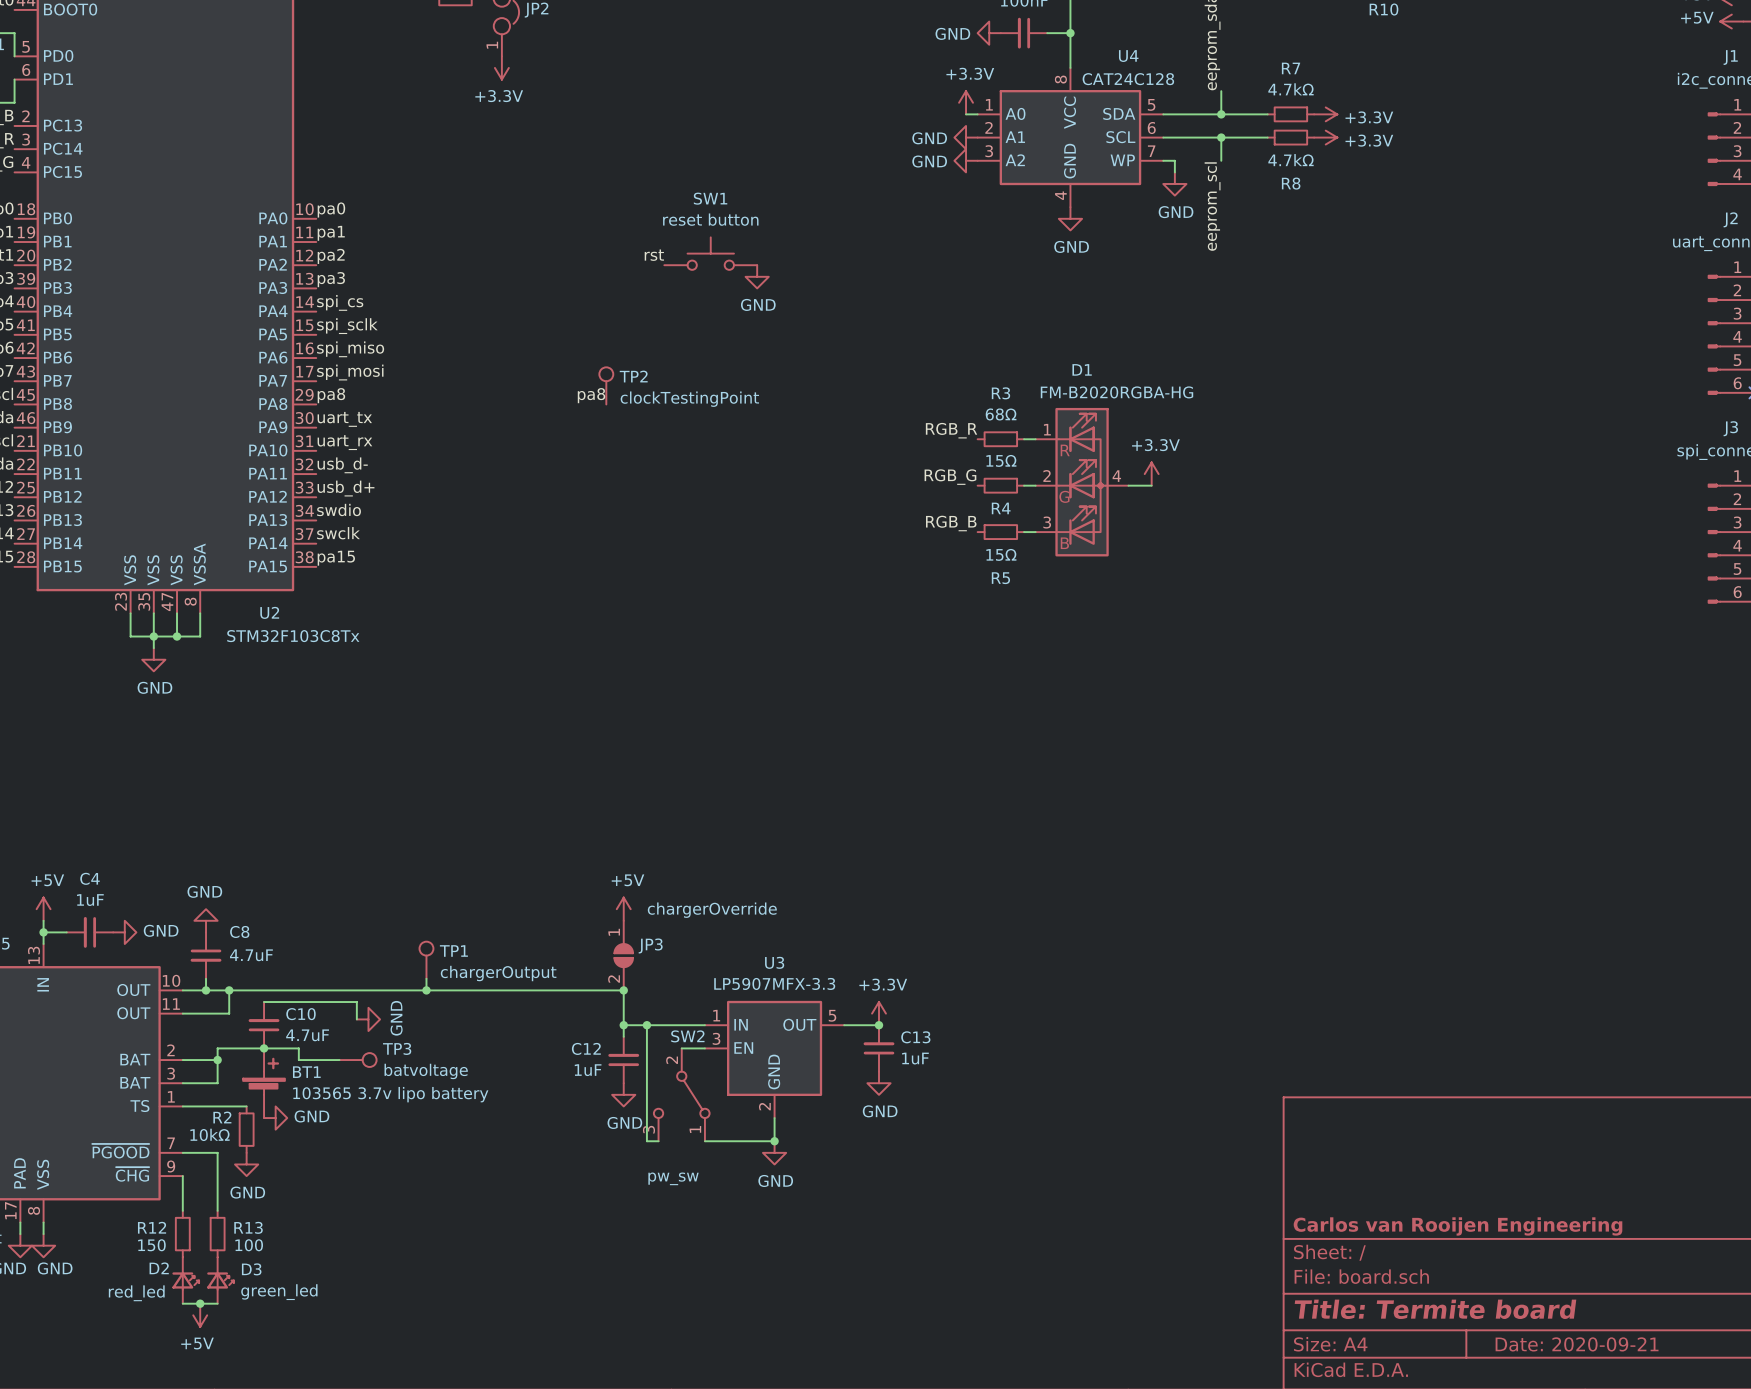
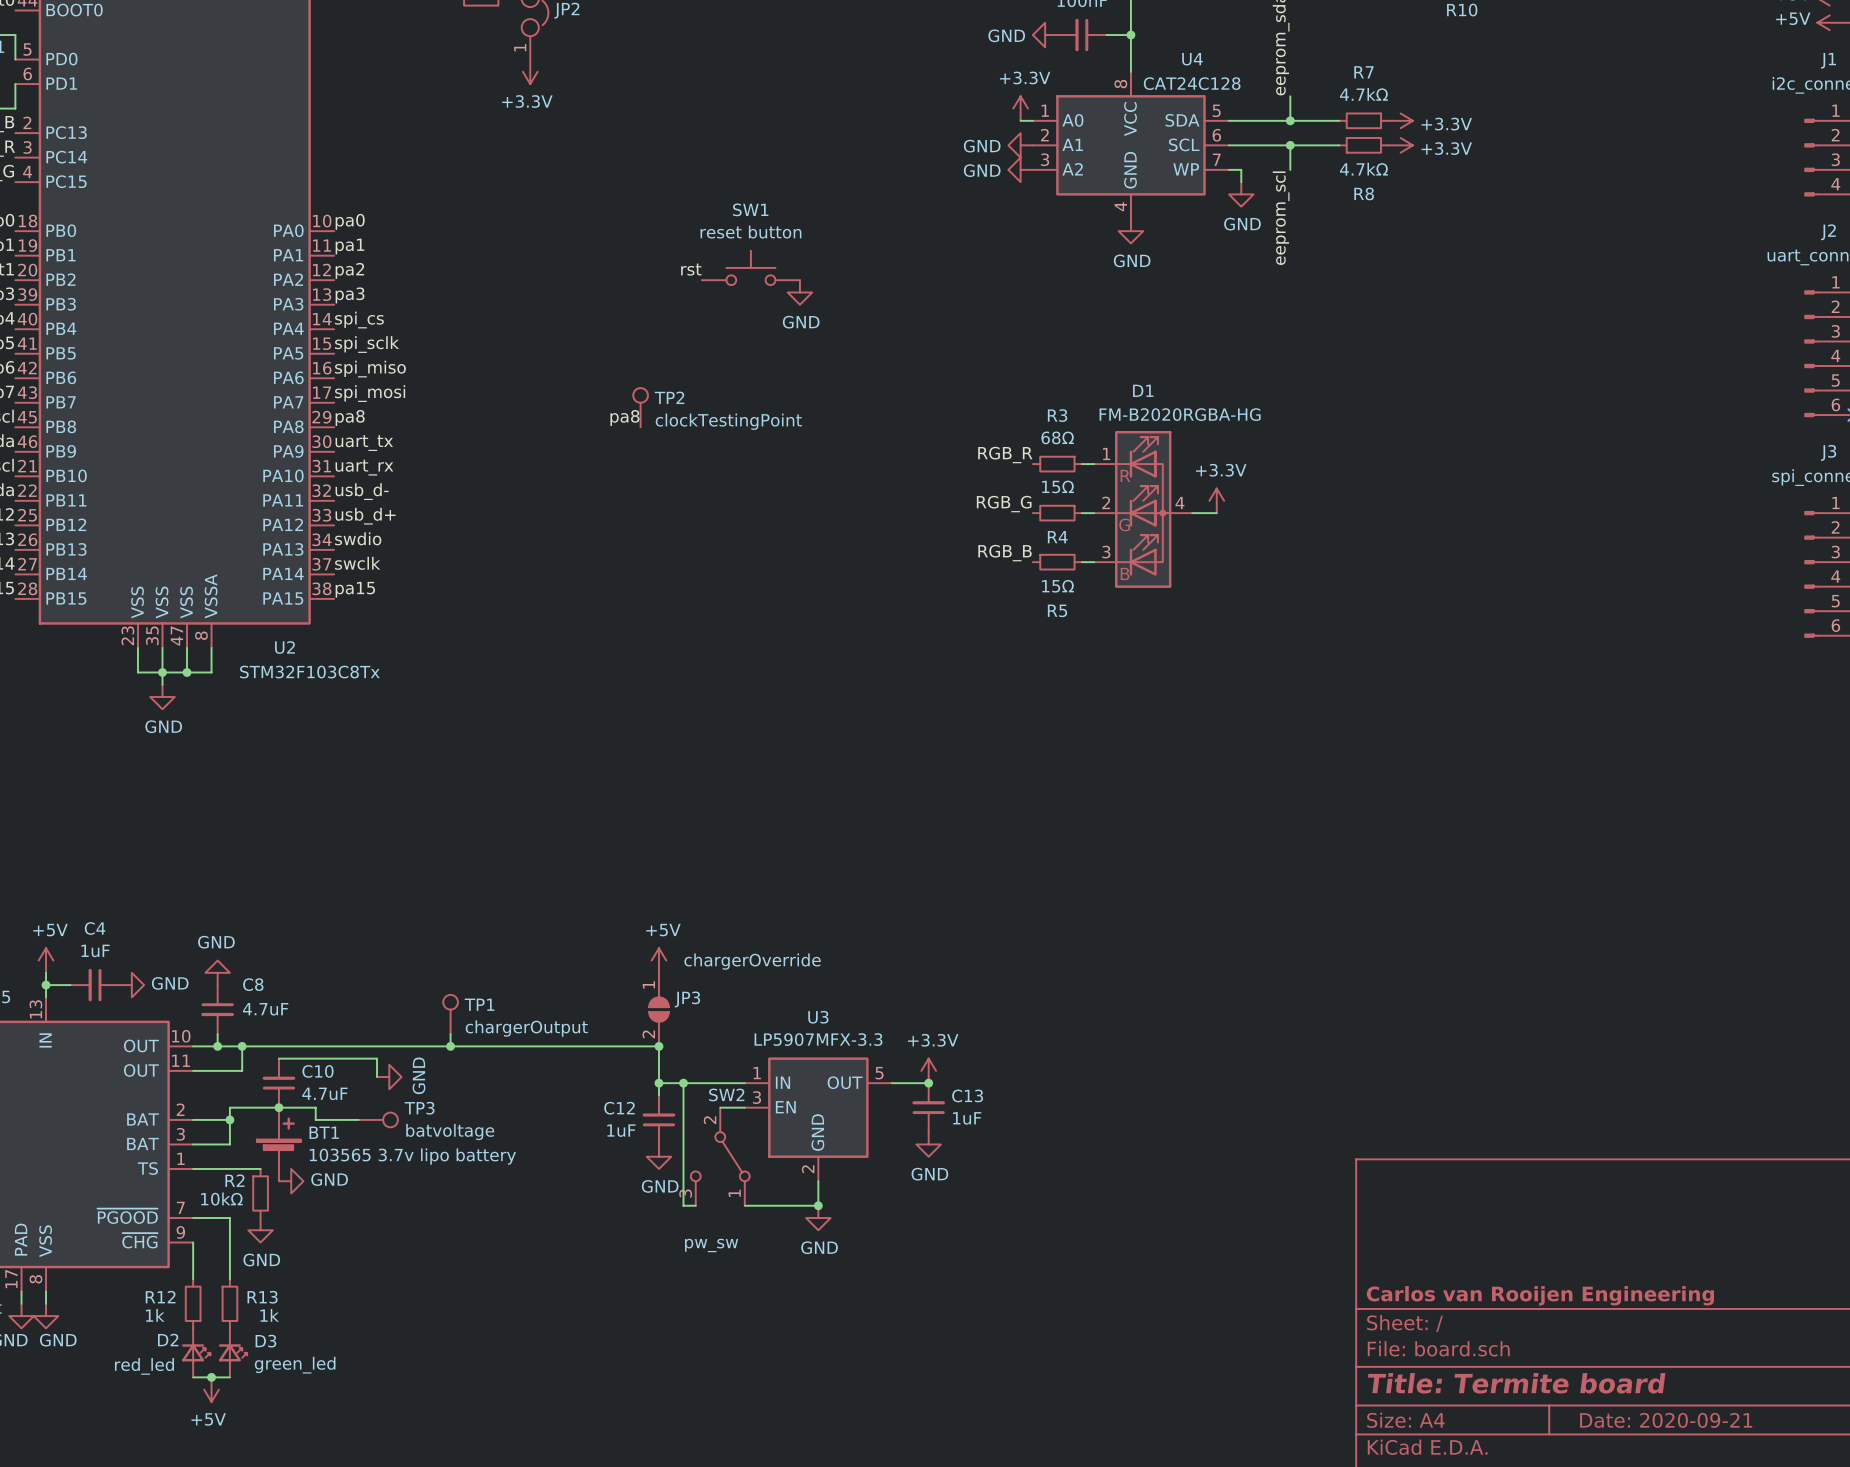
R12 value: 150 (151, 1245) -> 1k (155, 1315)
R13 value: 100 (249, 1245) -> 1k (269, 1315)

